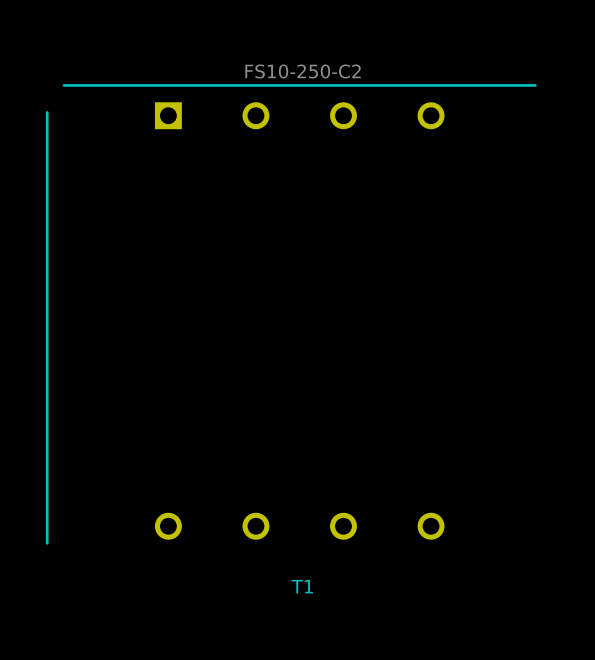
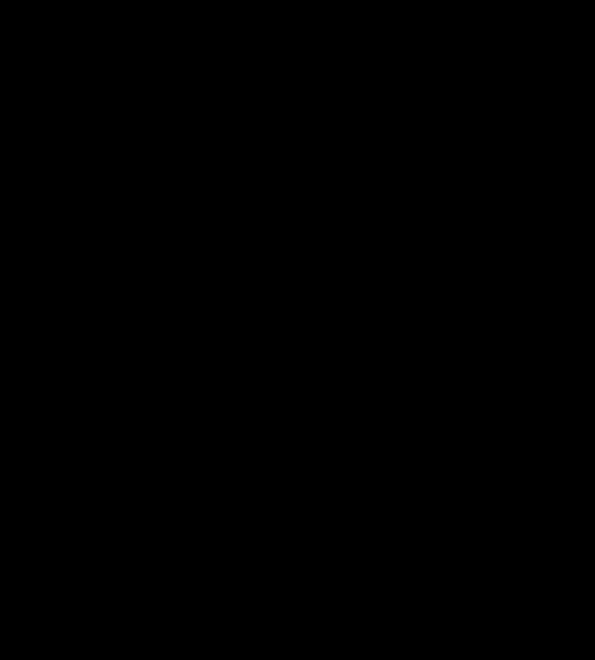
T1: FS10-250-C2 (291, 314) -> none

